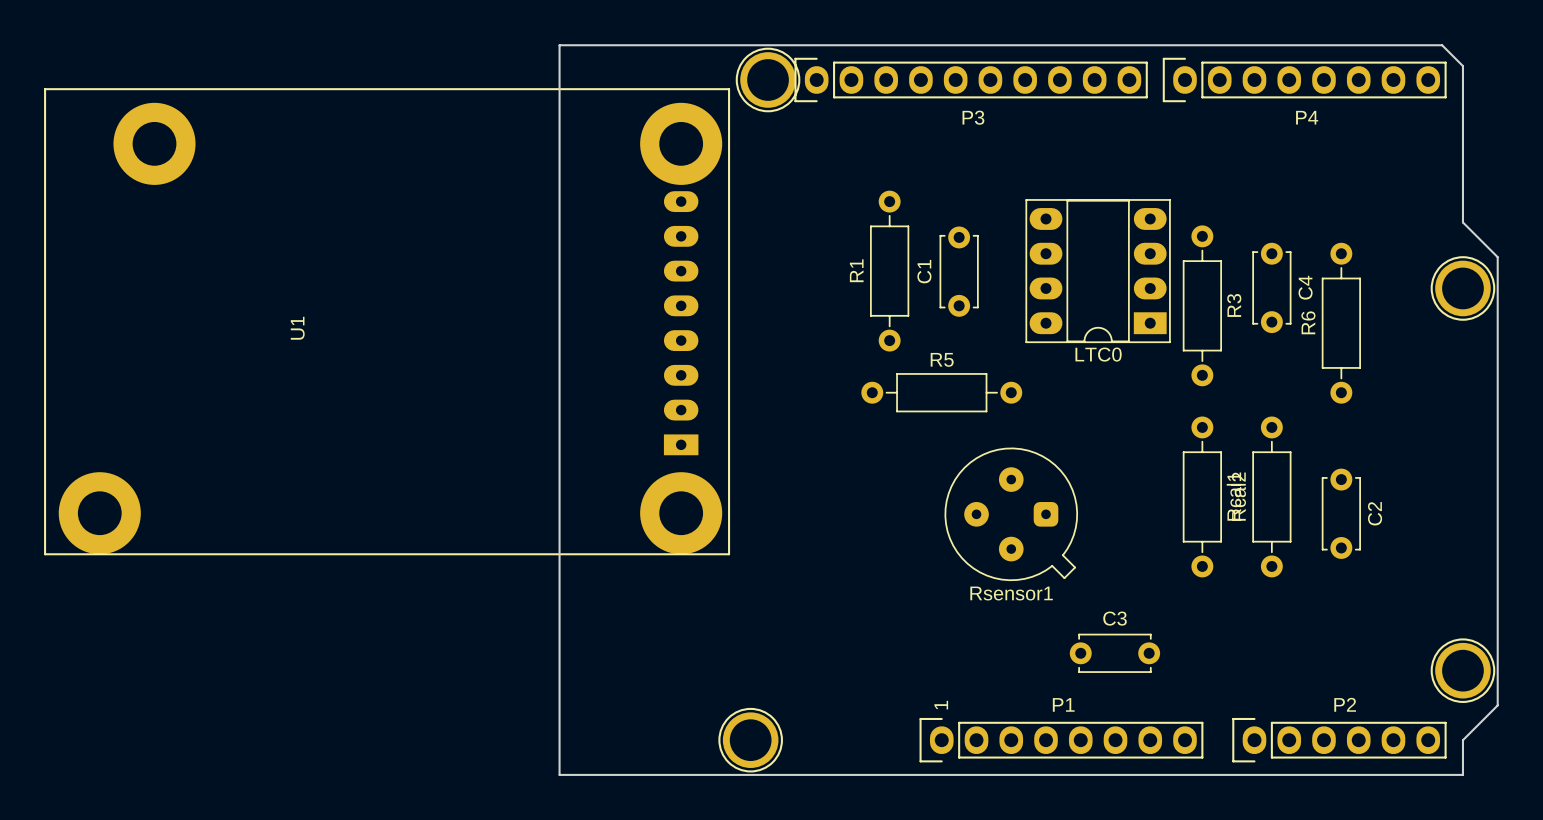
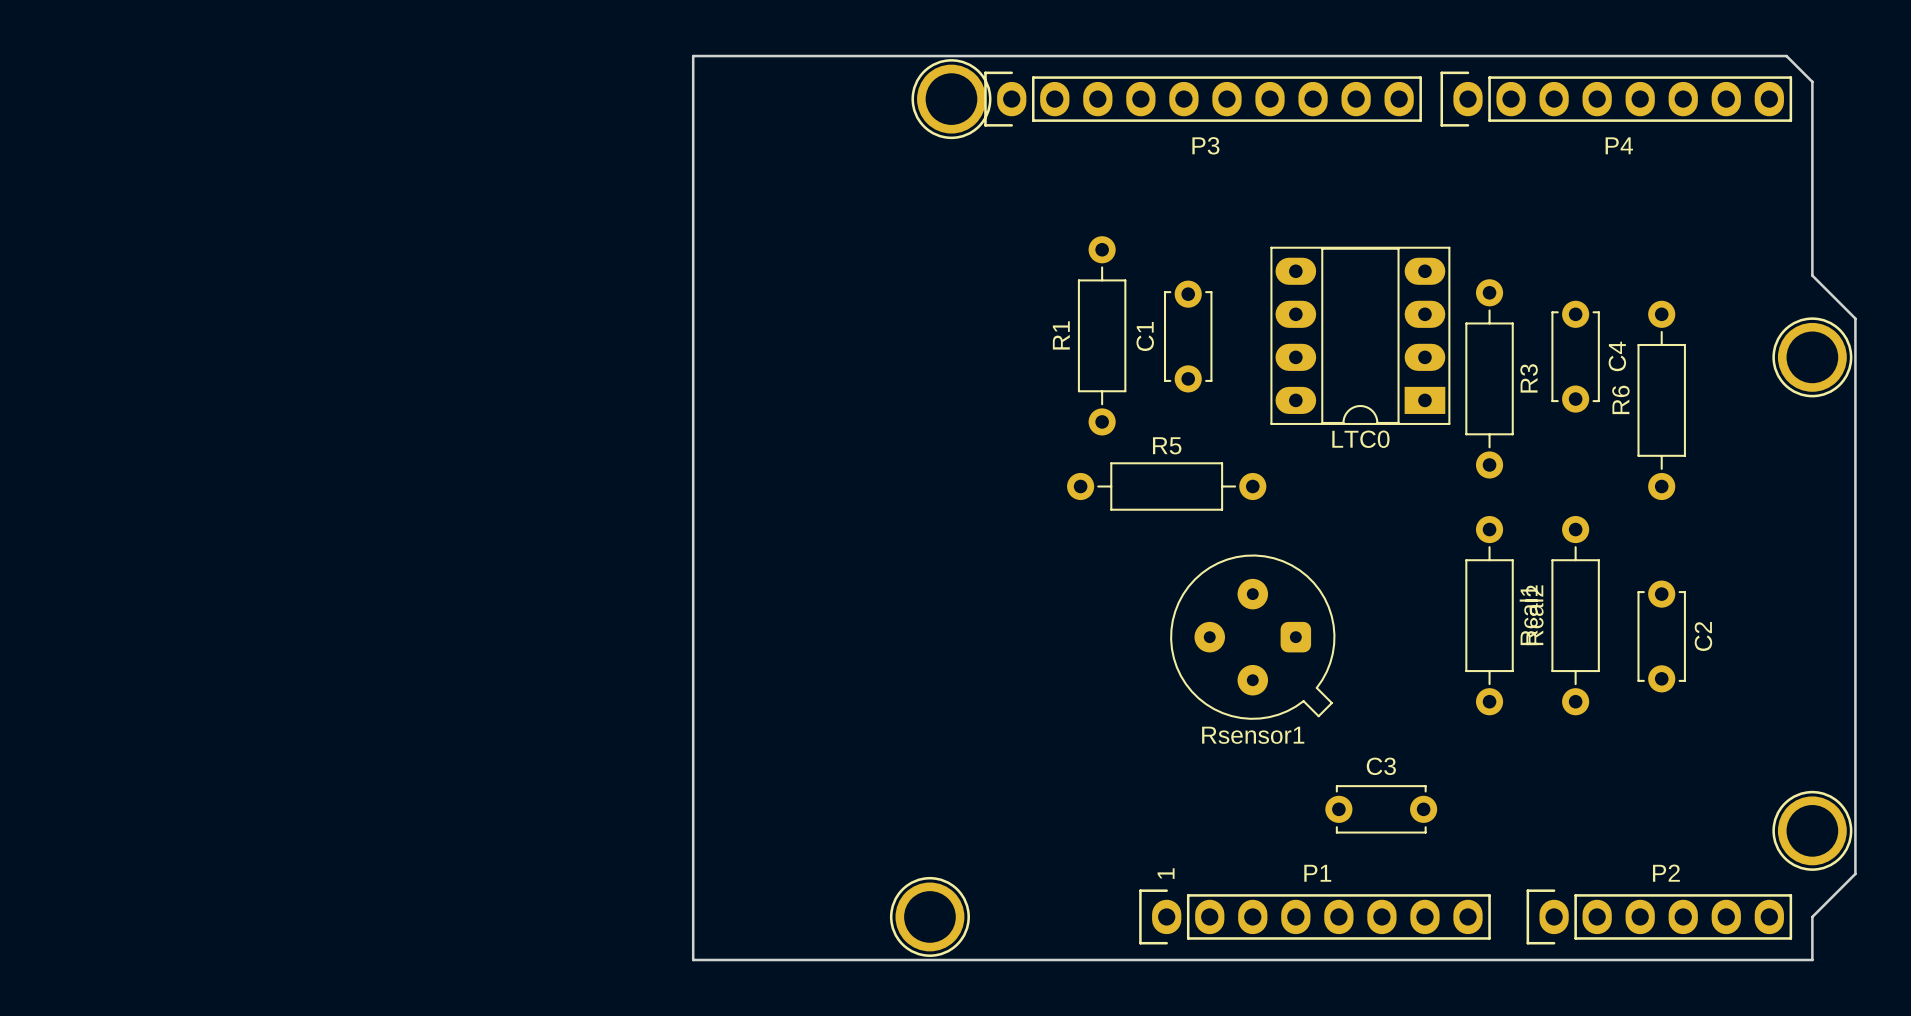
U1: (387, 321) -> none

